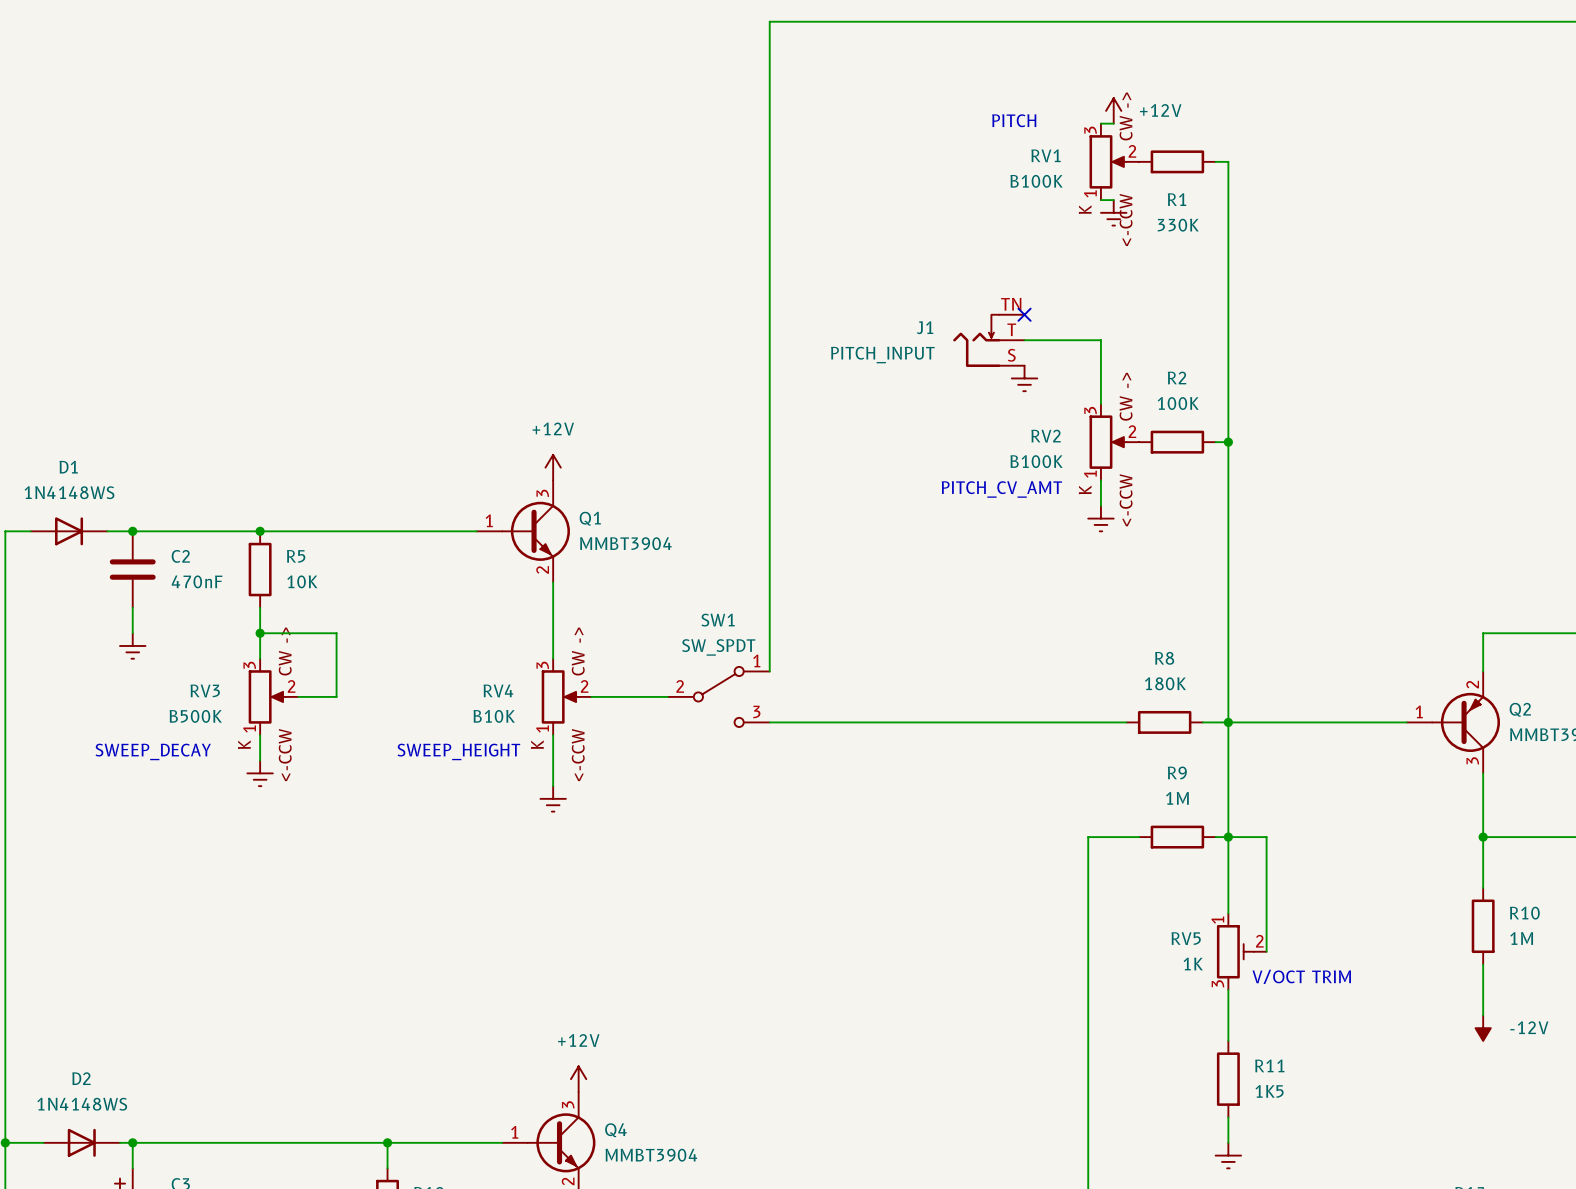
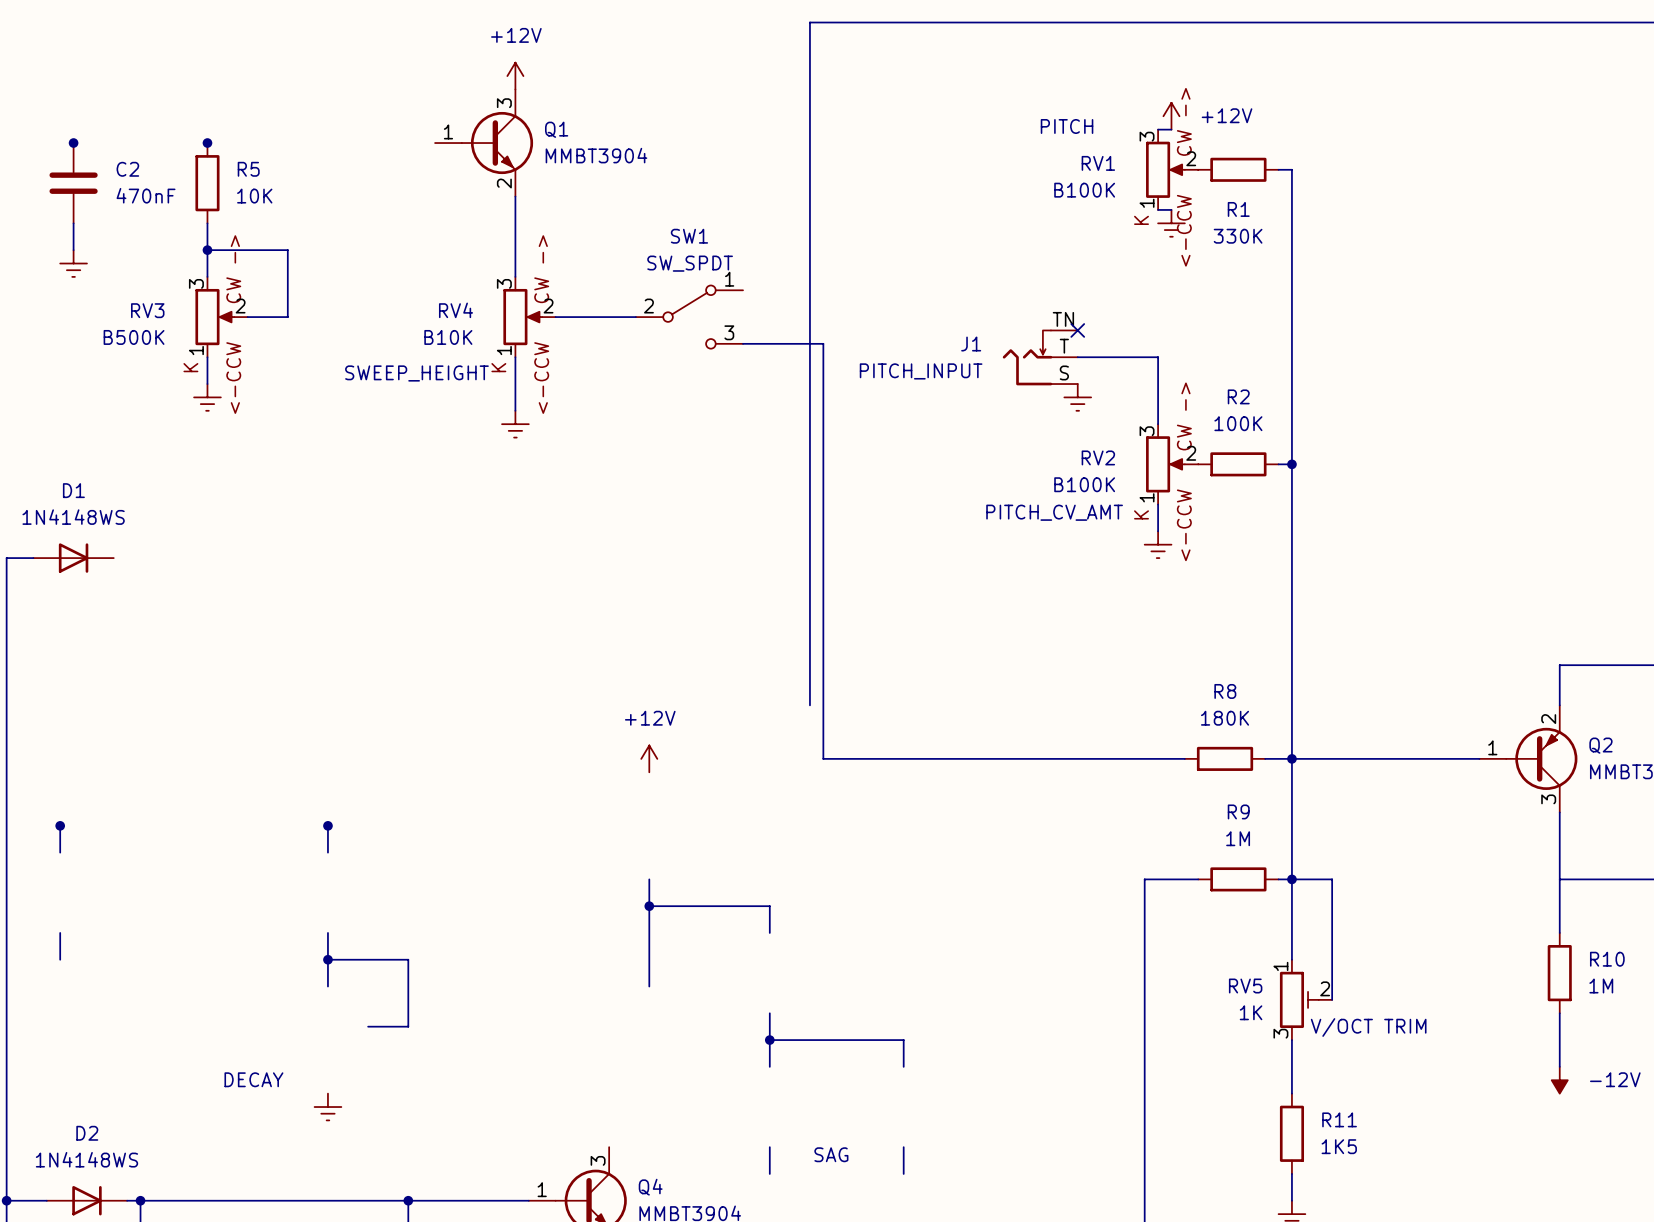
power symbol: none -> +12V (515, 76)
junction: none -> (73, 143)
junction: none -> (207, 143)
wire: none -> (515, 196) (515, 276)
wire: none -> (73, 223) (73, 250)
wire: none -> (207, 223) (207, 276)
wire: none -> (207, 250) (287, 250) (287, 317) (247, 317)
junction: none -> (207, 250)
power symbol: none -> (73, 263)
wire: none -> (555, 317) (635, 317)
wire: none -> (207, 357) (207, 384)
wire: none -> (515, 357) (515, 410)
text: none -> SWEEP_HEIGHT (416, 373)
power symbol: none -> (207, 397)
power symbol: none -> (515, 424)
power symbol: +12V (553, 467) -> none
wire: (107, 531) (476, 531) -> none
junction: (132, 531) -> none
junction: (260, 531) -> none
Q1 position: (523, 531) -> (484, 143)
C2 position: (132, 569) -> (73, 183)
R5 position: (260, 569) -> (207, 183)
wire: (553, 582) (553, 658) -> none
wire: (132, 607) (132, 633) -> (60, 825) (60, 852)
wire: (260, 607) (260, 658) -> none
wire: (260, 633) (336, 633) (336, 696) (298, 696) -> none
junction: (260, 633) -> none
power symbol: (132, 645) -> none
RV3 position: (273, 696) -> (221, 317)
RV4 position: (566, 696) -> (529, 317)
wire: (591, 696) (667, 696) -> none
SW1 position: (718, 696) -> (689, 317)
power symbol: none -> +12V (649, 758)
wire: (769, 722) (782, 722) -> (743, 343) (823, 343) (823, 758)
wire: (260, 735) (260, 760) -> (327, 825) (327, 852)
wire: (553, 735) (553, 786) -> none
text: SWEEP_DECAY (153, 751) -> none
text: SWEEP_HEIGHT (458, 751) -> none
power symbol: (260, 773) -> none
junction: none -> (60, 825)
junction: none -> (327, 825)
power symbol: (553, 798) -> none
wire: none -> (649, 879) (649, 986)
junction: (1483, 837) -> none
wire: none -> (649, 906) (769, 906) (769, 932)
junction: none -> (649, 906)
wire: none -> (60, 932) (60, 959)
wire: none -> (327, 932) (327, 986)
wire: none -> (327, 959) (408, 959) (408, 1026) (368, 1026)
junction: none -> (327, 959)
wire: none -> (769, 1013) (769, 1066)
wire: none -> (769, 1040) (903, 1040) (903, 1066)
junction: none -> (769, 1040)
text: none -> DECAY (253, 1079)
power symbol: none -> (327, 1107)
power symbol: +12V (578, 1079) -> none
wire: none -> (769, 1147) (769, 1173)
wire: none -> (903, 1147) (903, 1173)
text: none -> SAG (831, 1154)

